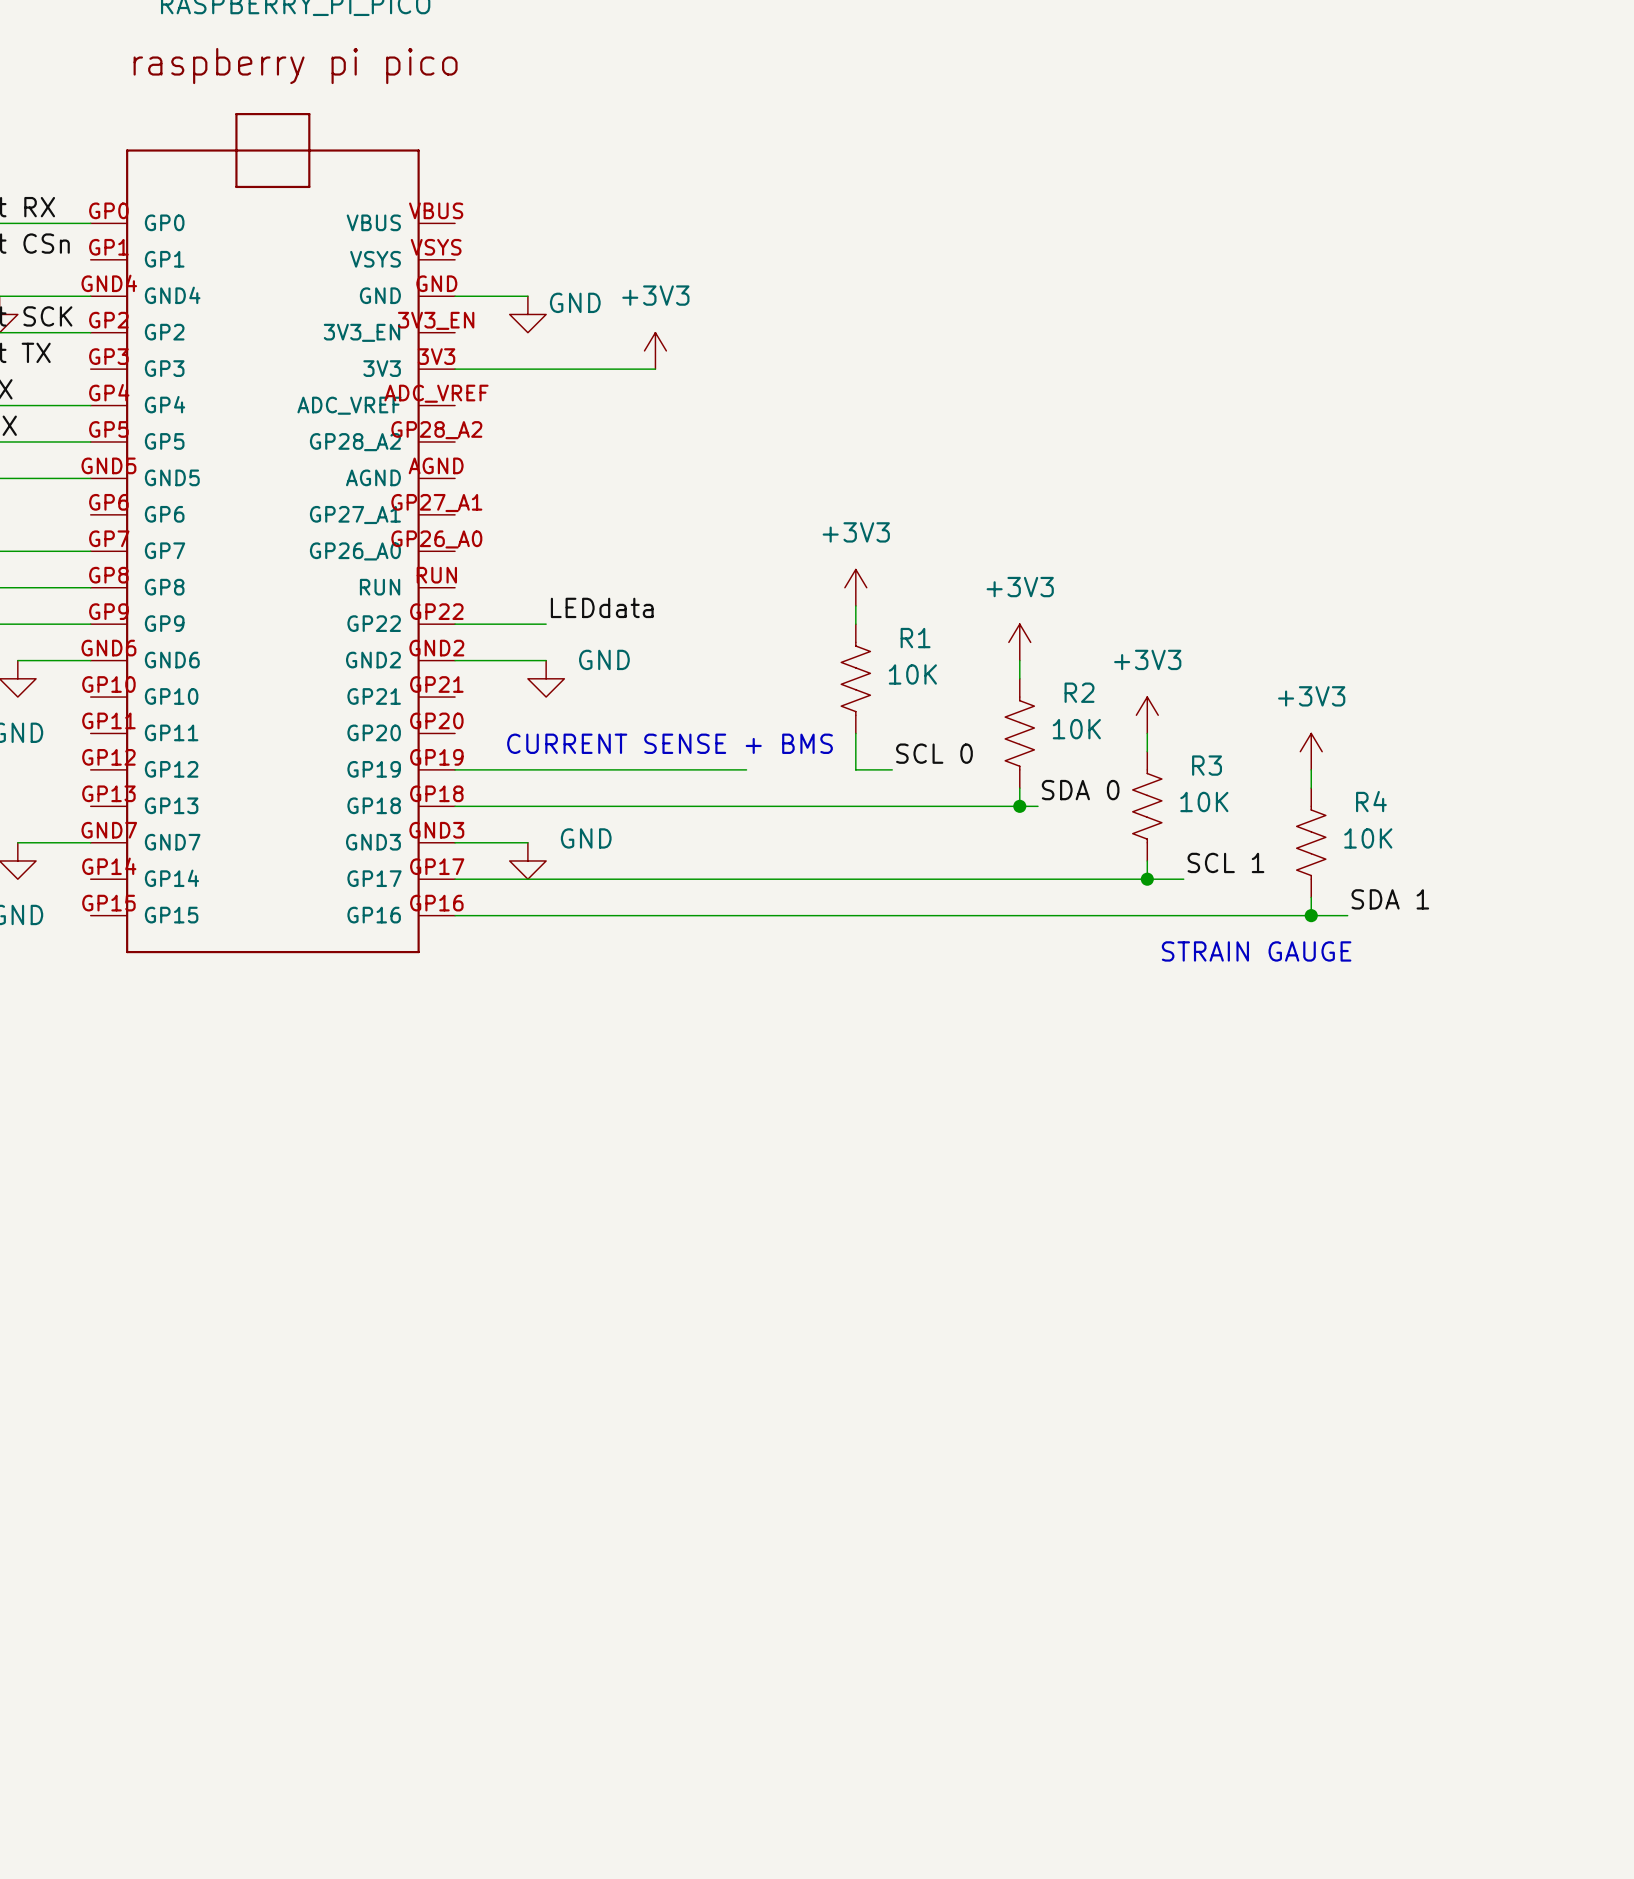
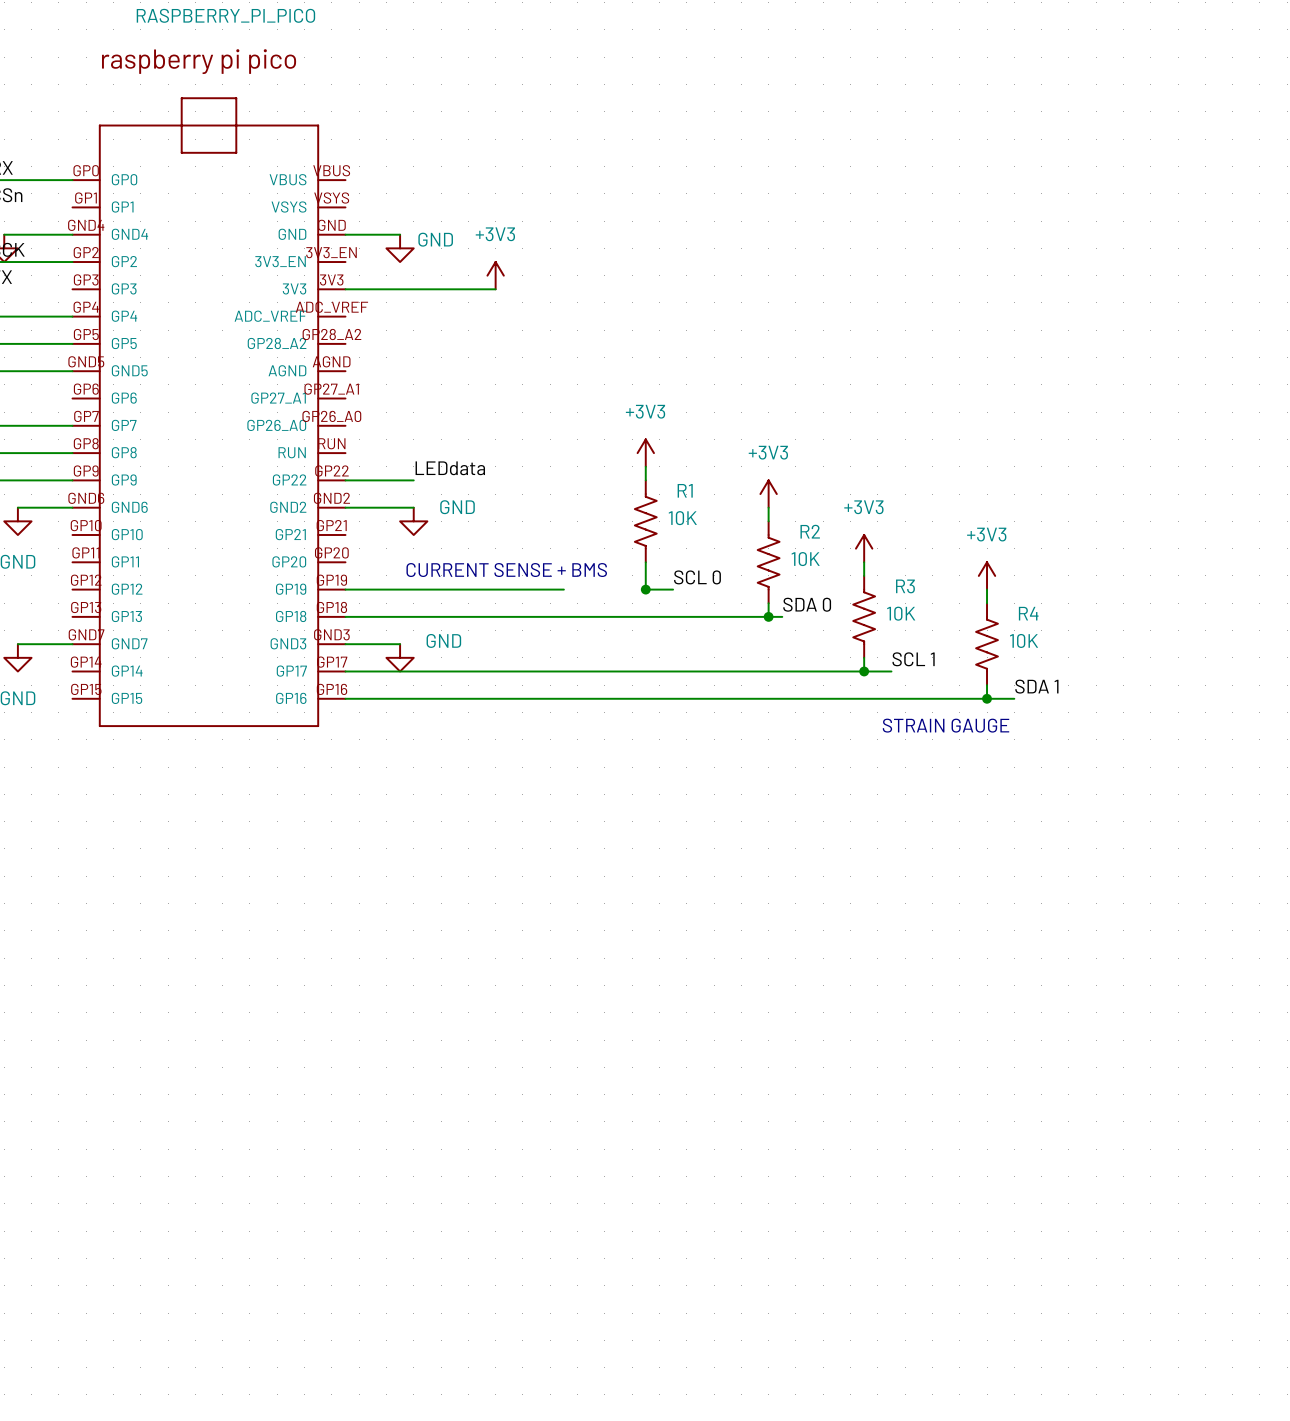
junction: none -> (645, 589)

